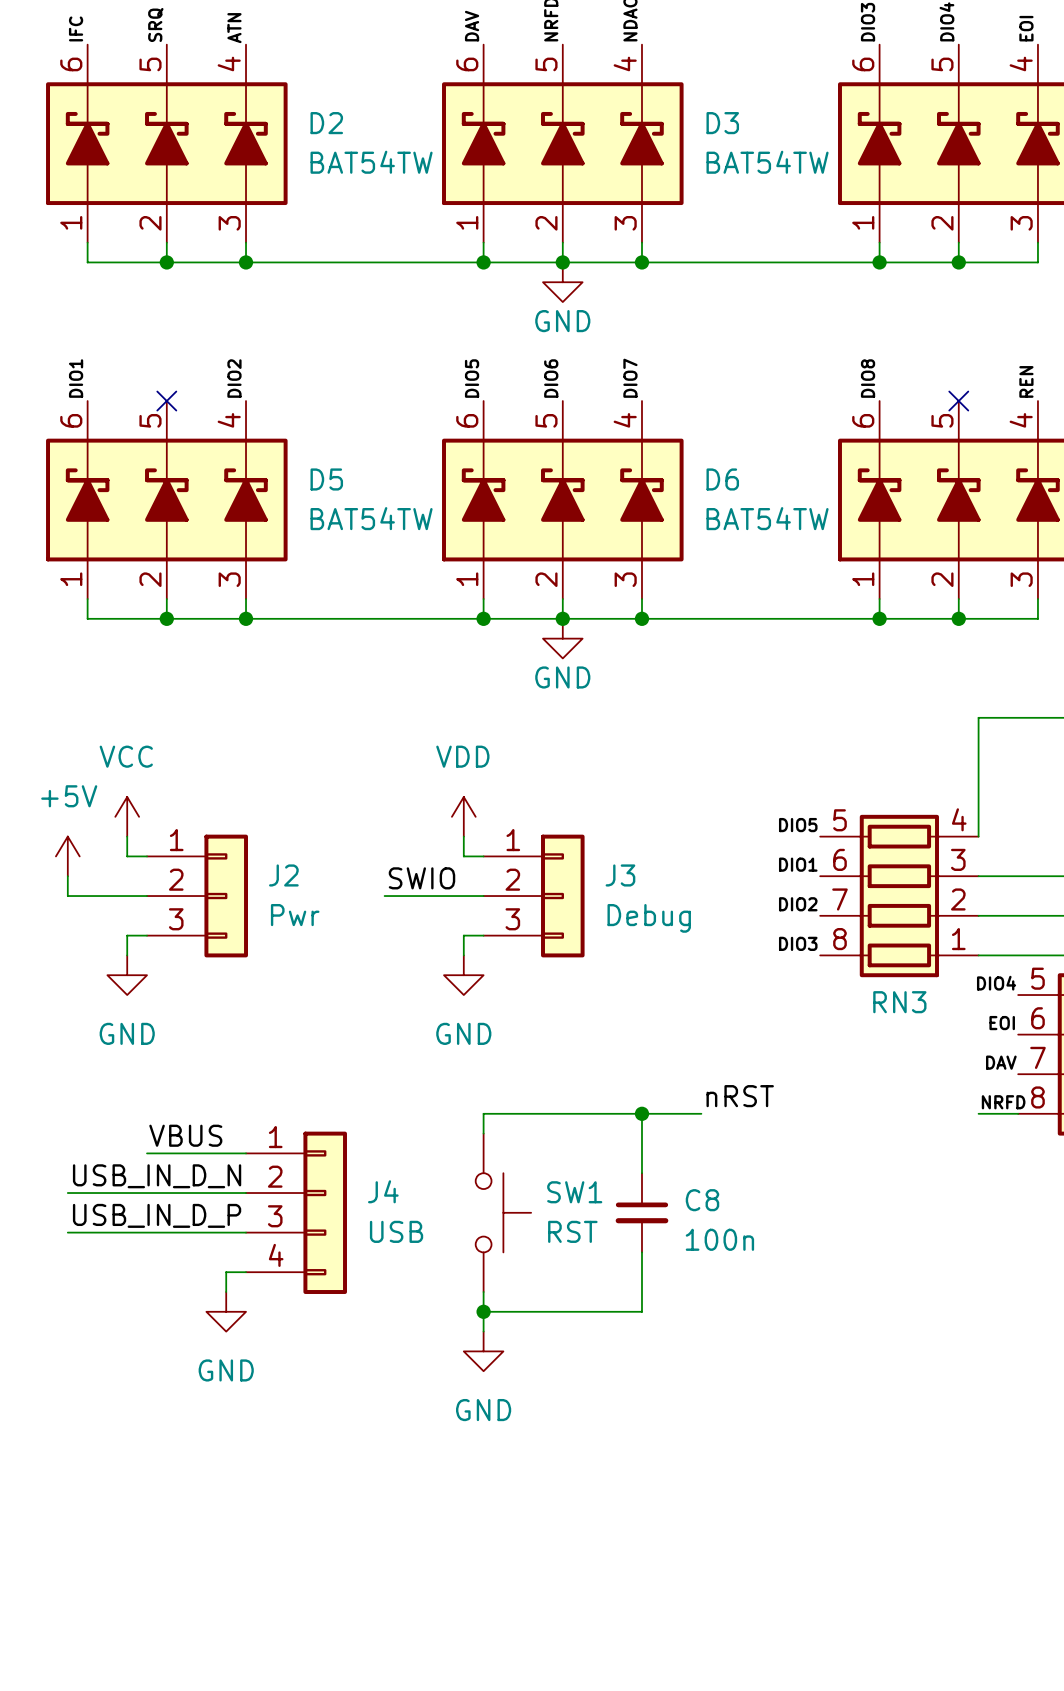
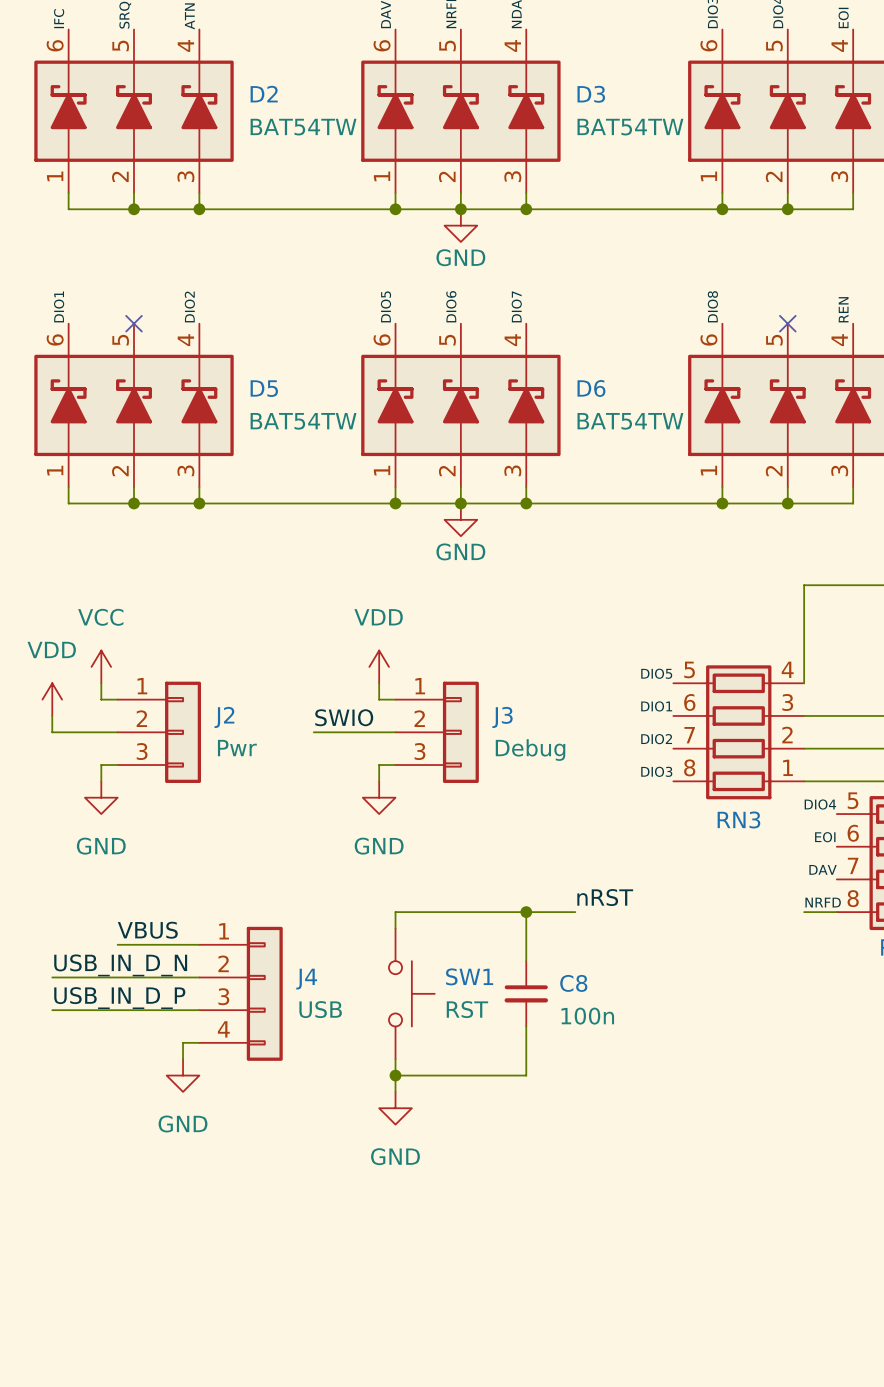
power symbol: +5V (67, 856) -> VDD (52, 699)

